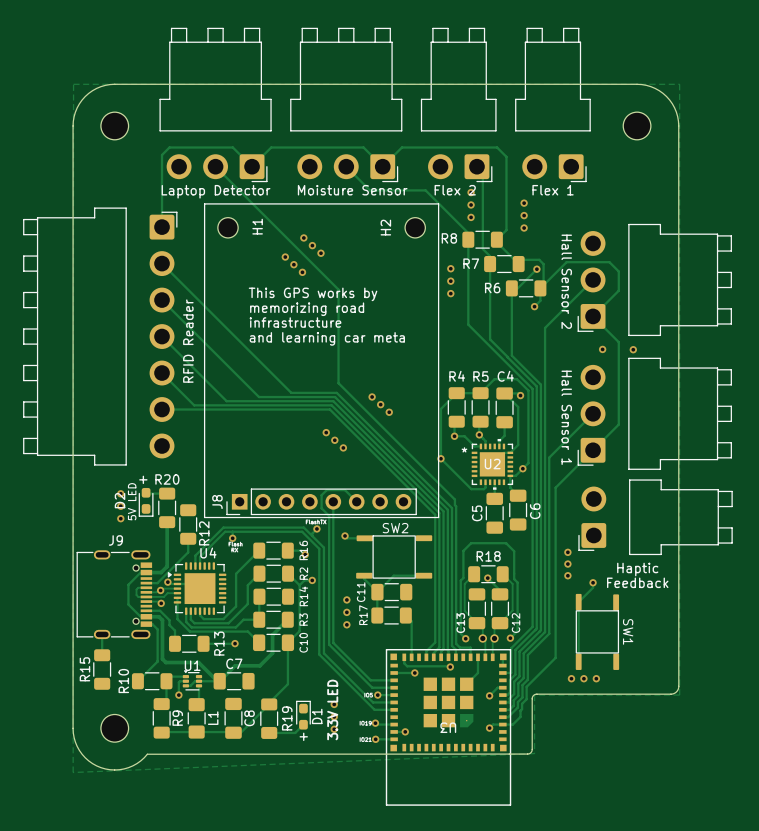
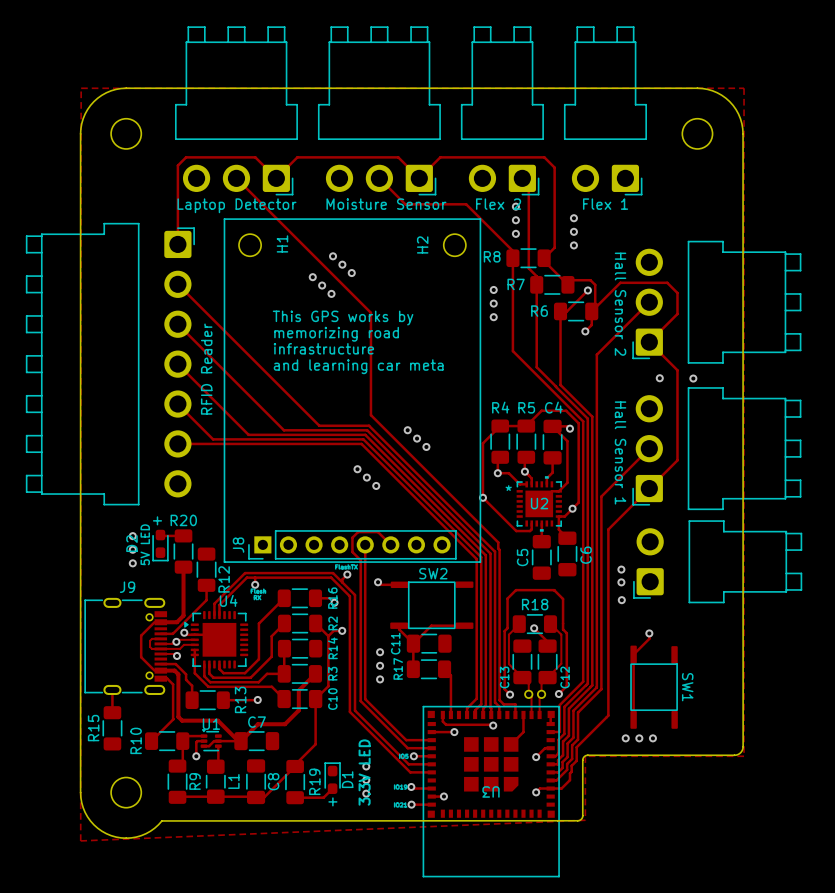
via: none -> (621, 569)
via: none -> (621, 582)
via: (567, 564) -> none
text: Haptic (637, 569) -> none
via: (567, 575) -> none
text: Feedback (637, 582) -> none

